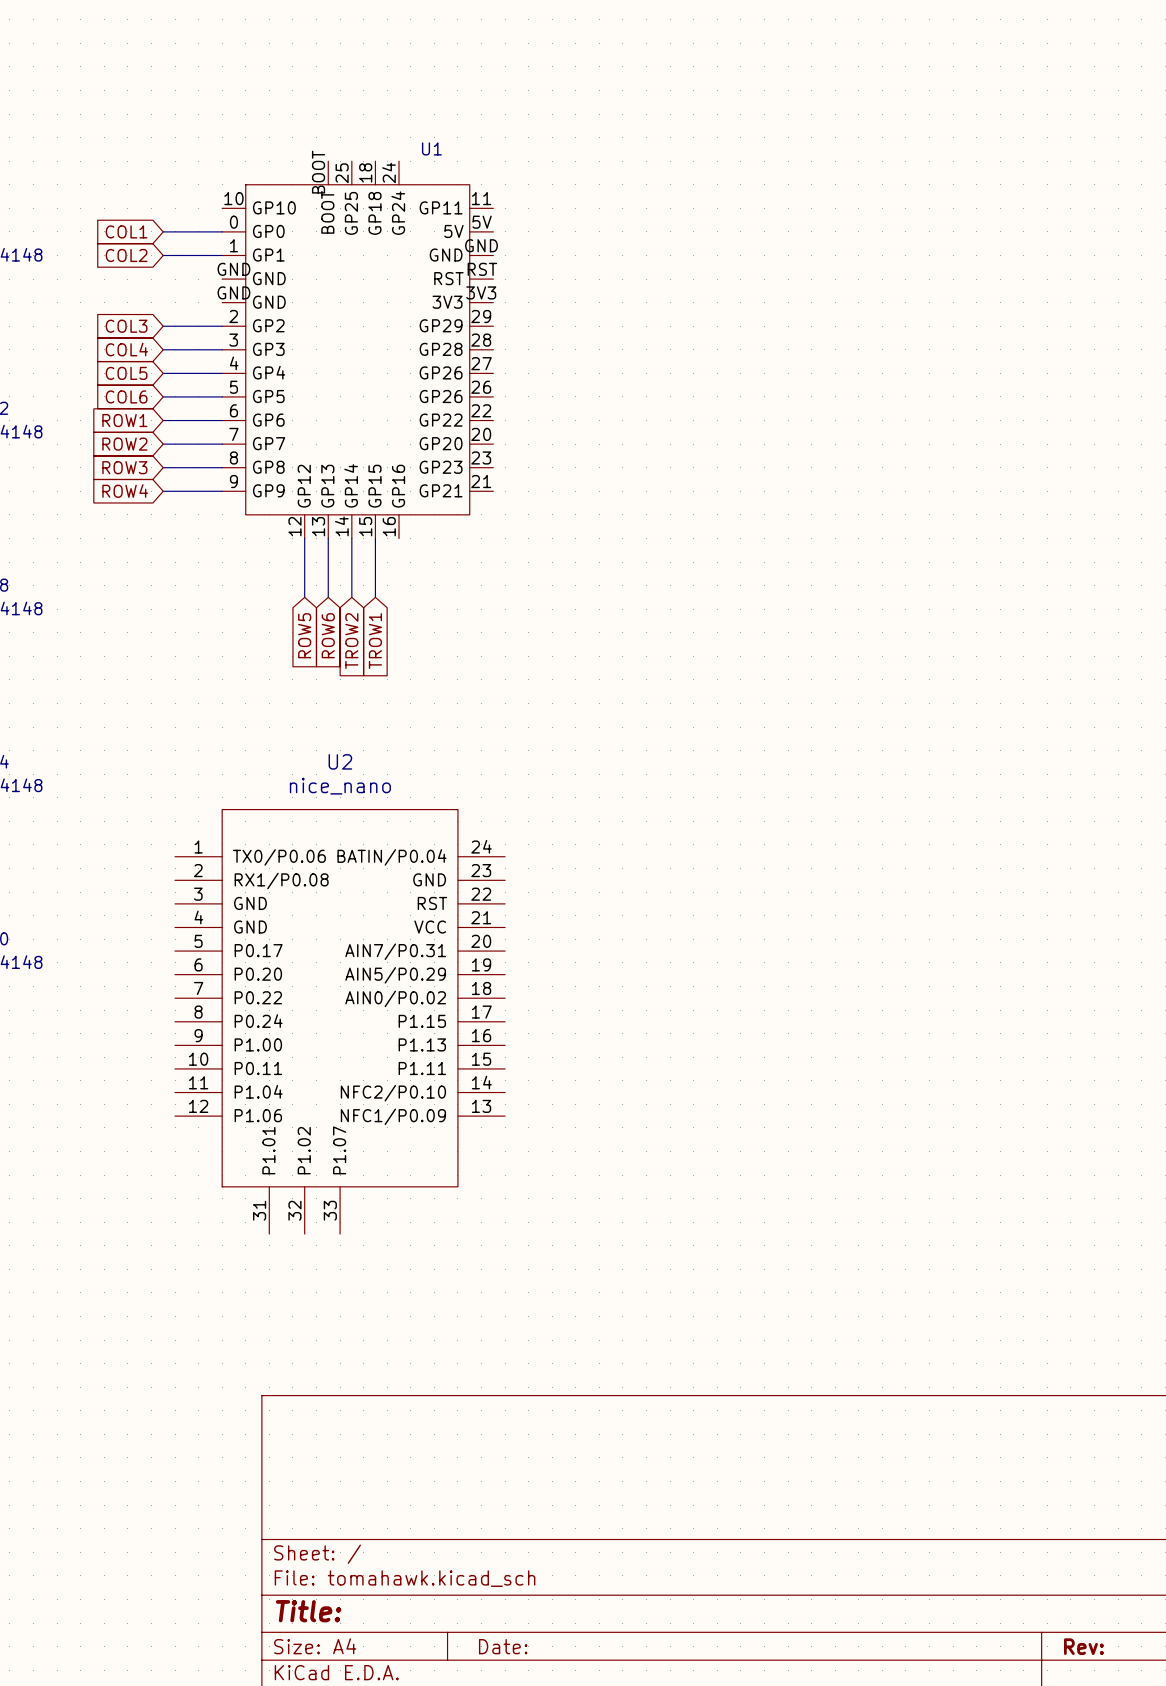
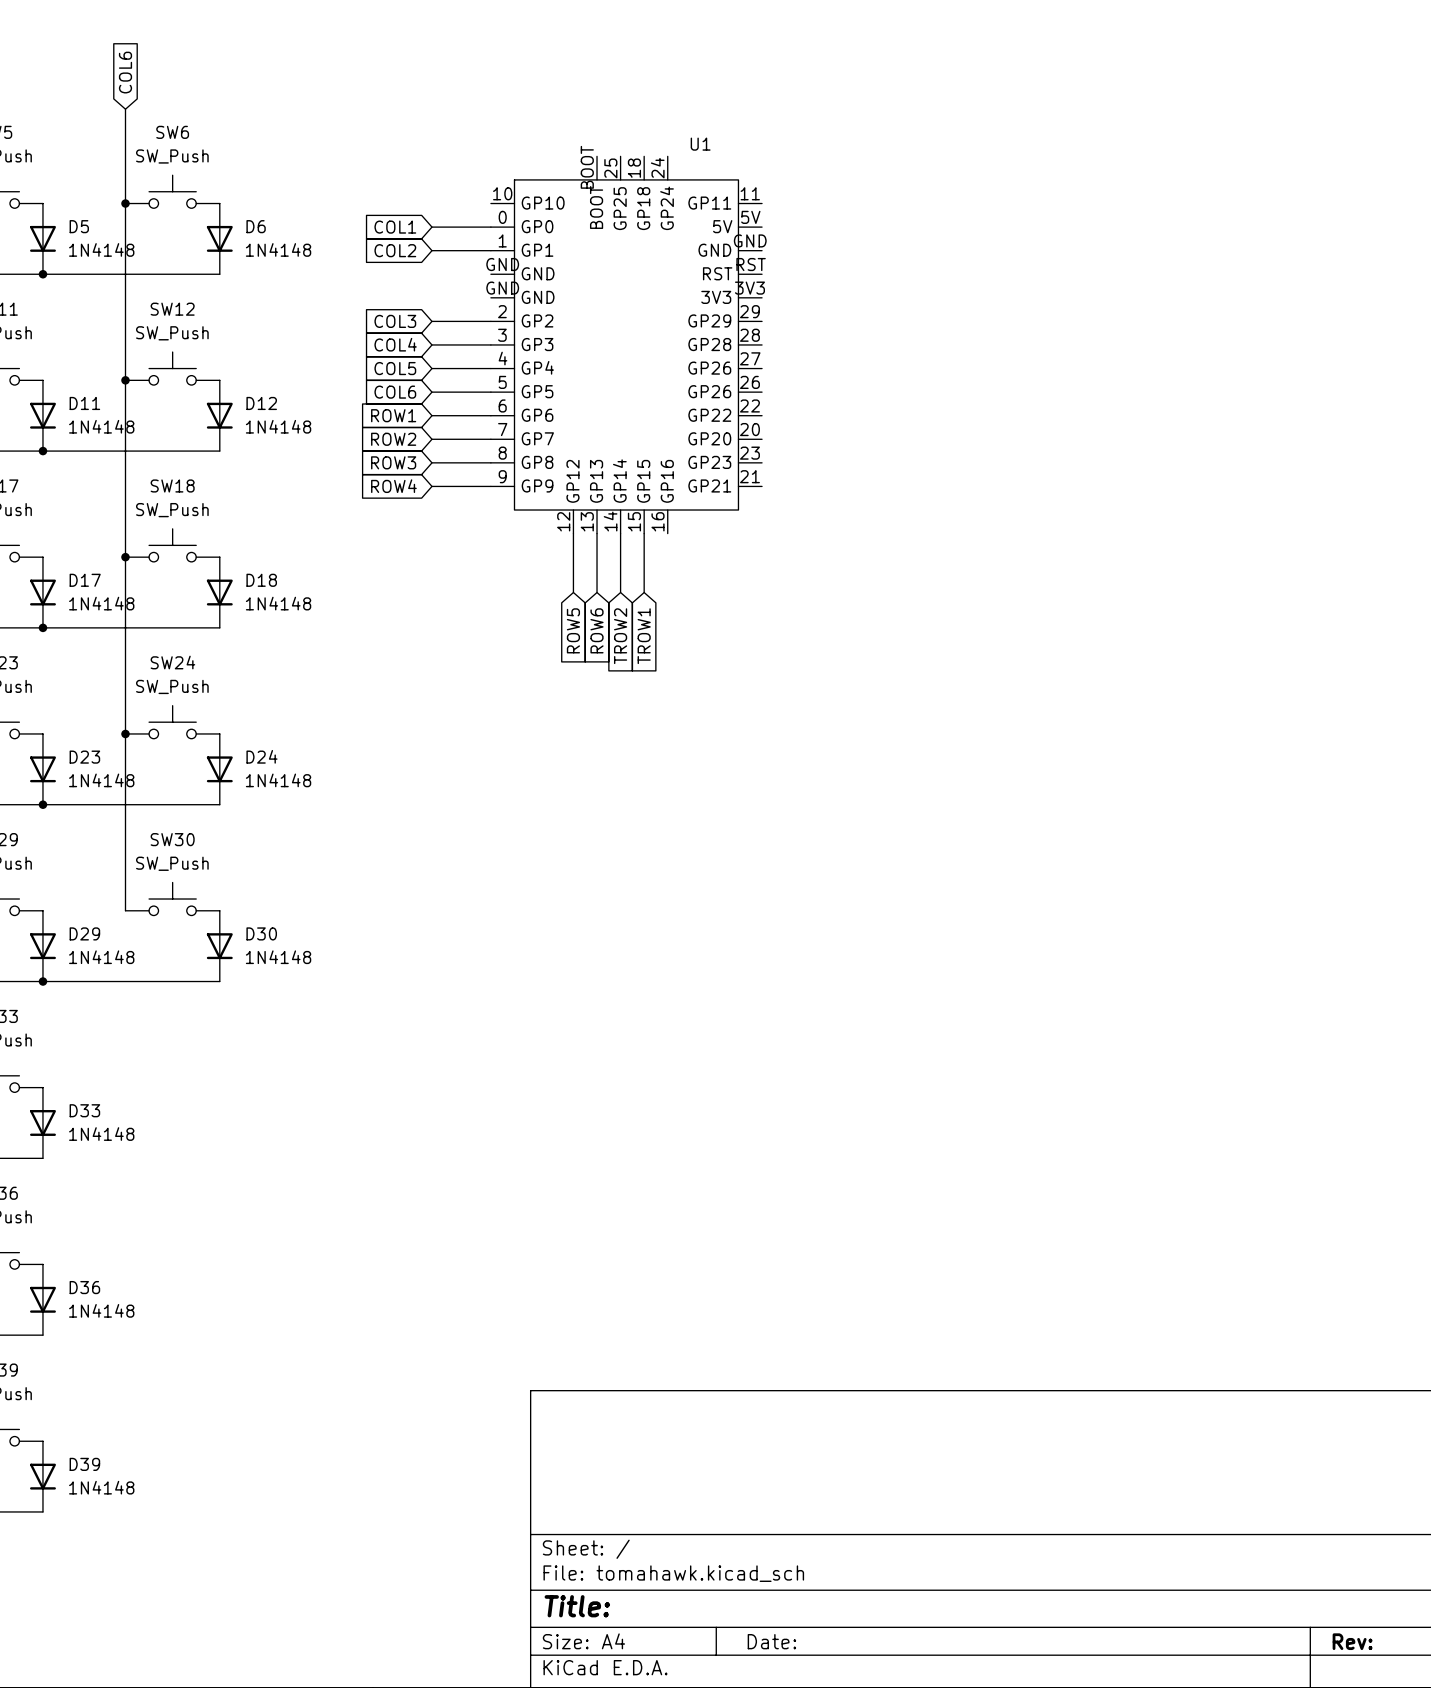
U2: nice_nano (340, 1021) -> none

